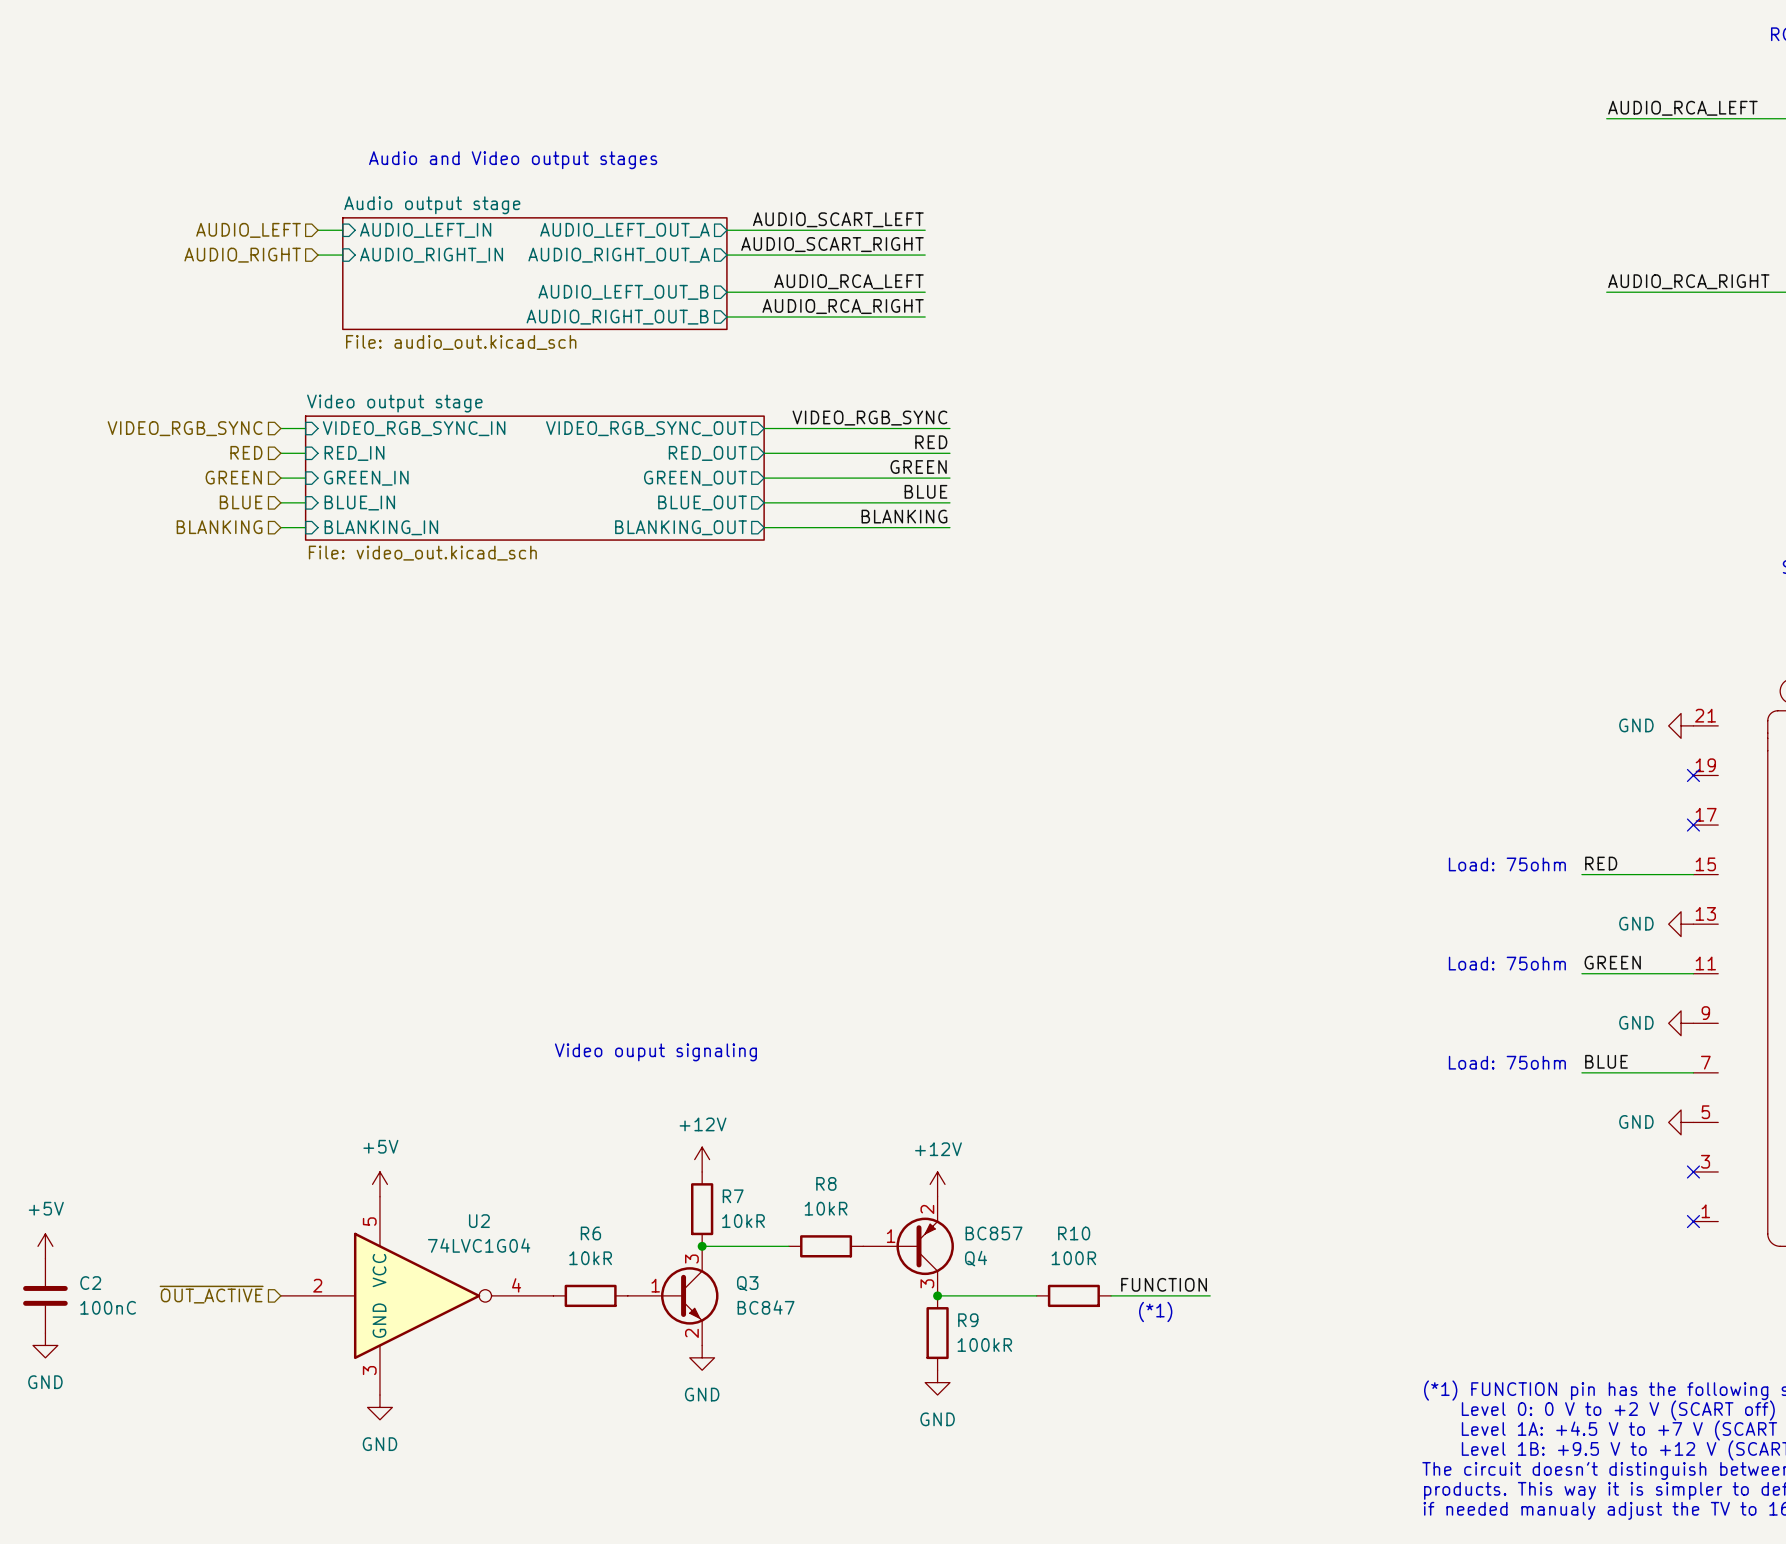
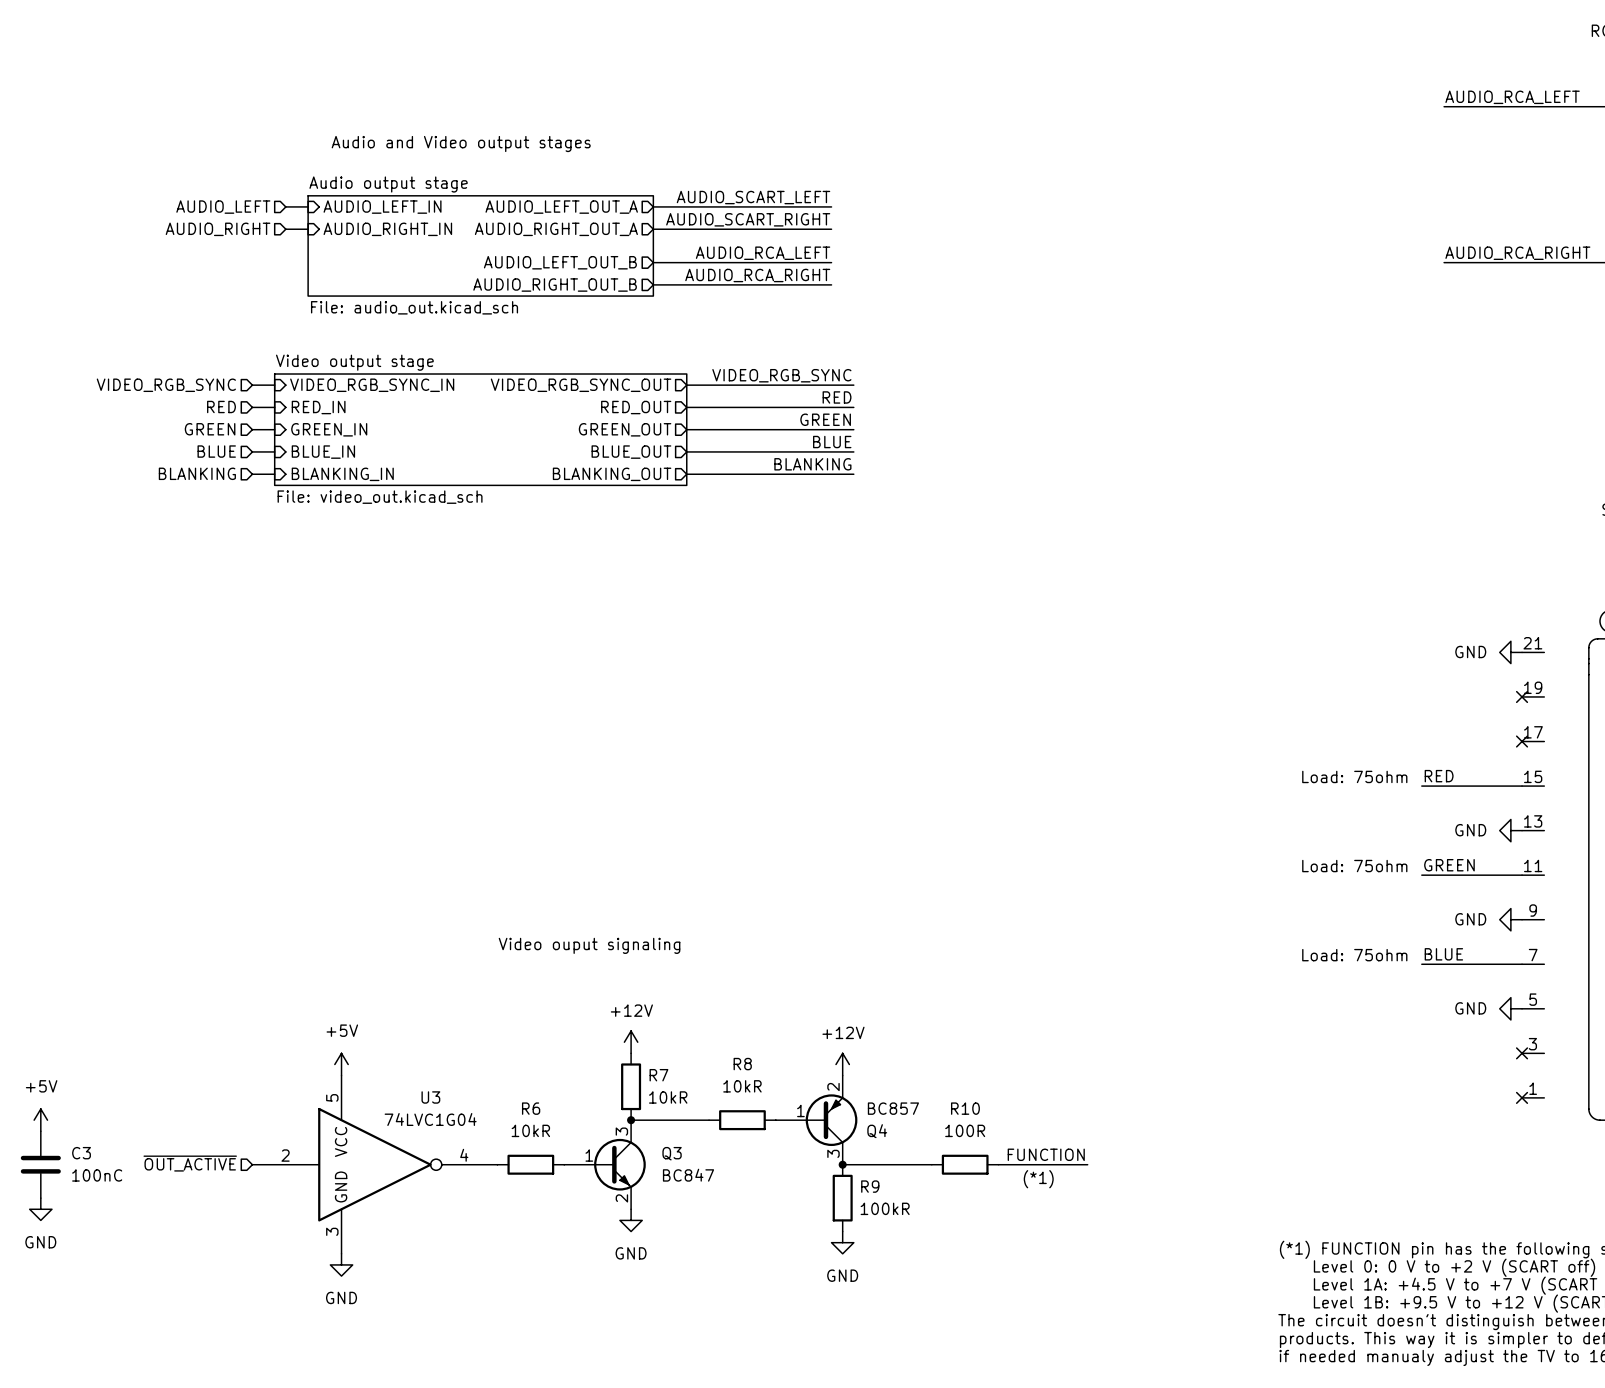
U2 name: U2 (479, 1221) -> U3 (430, 1097)
C2 name: C2 (90, 1283) -> C3 (81, 1153)

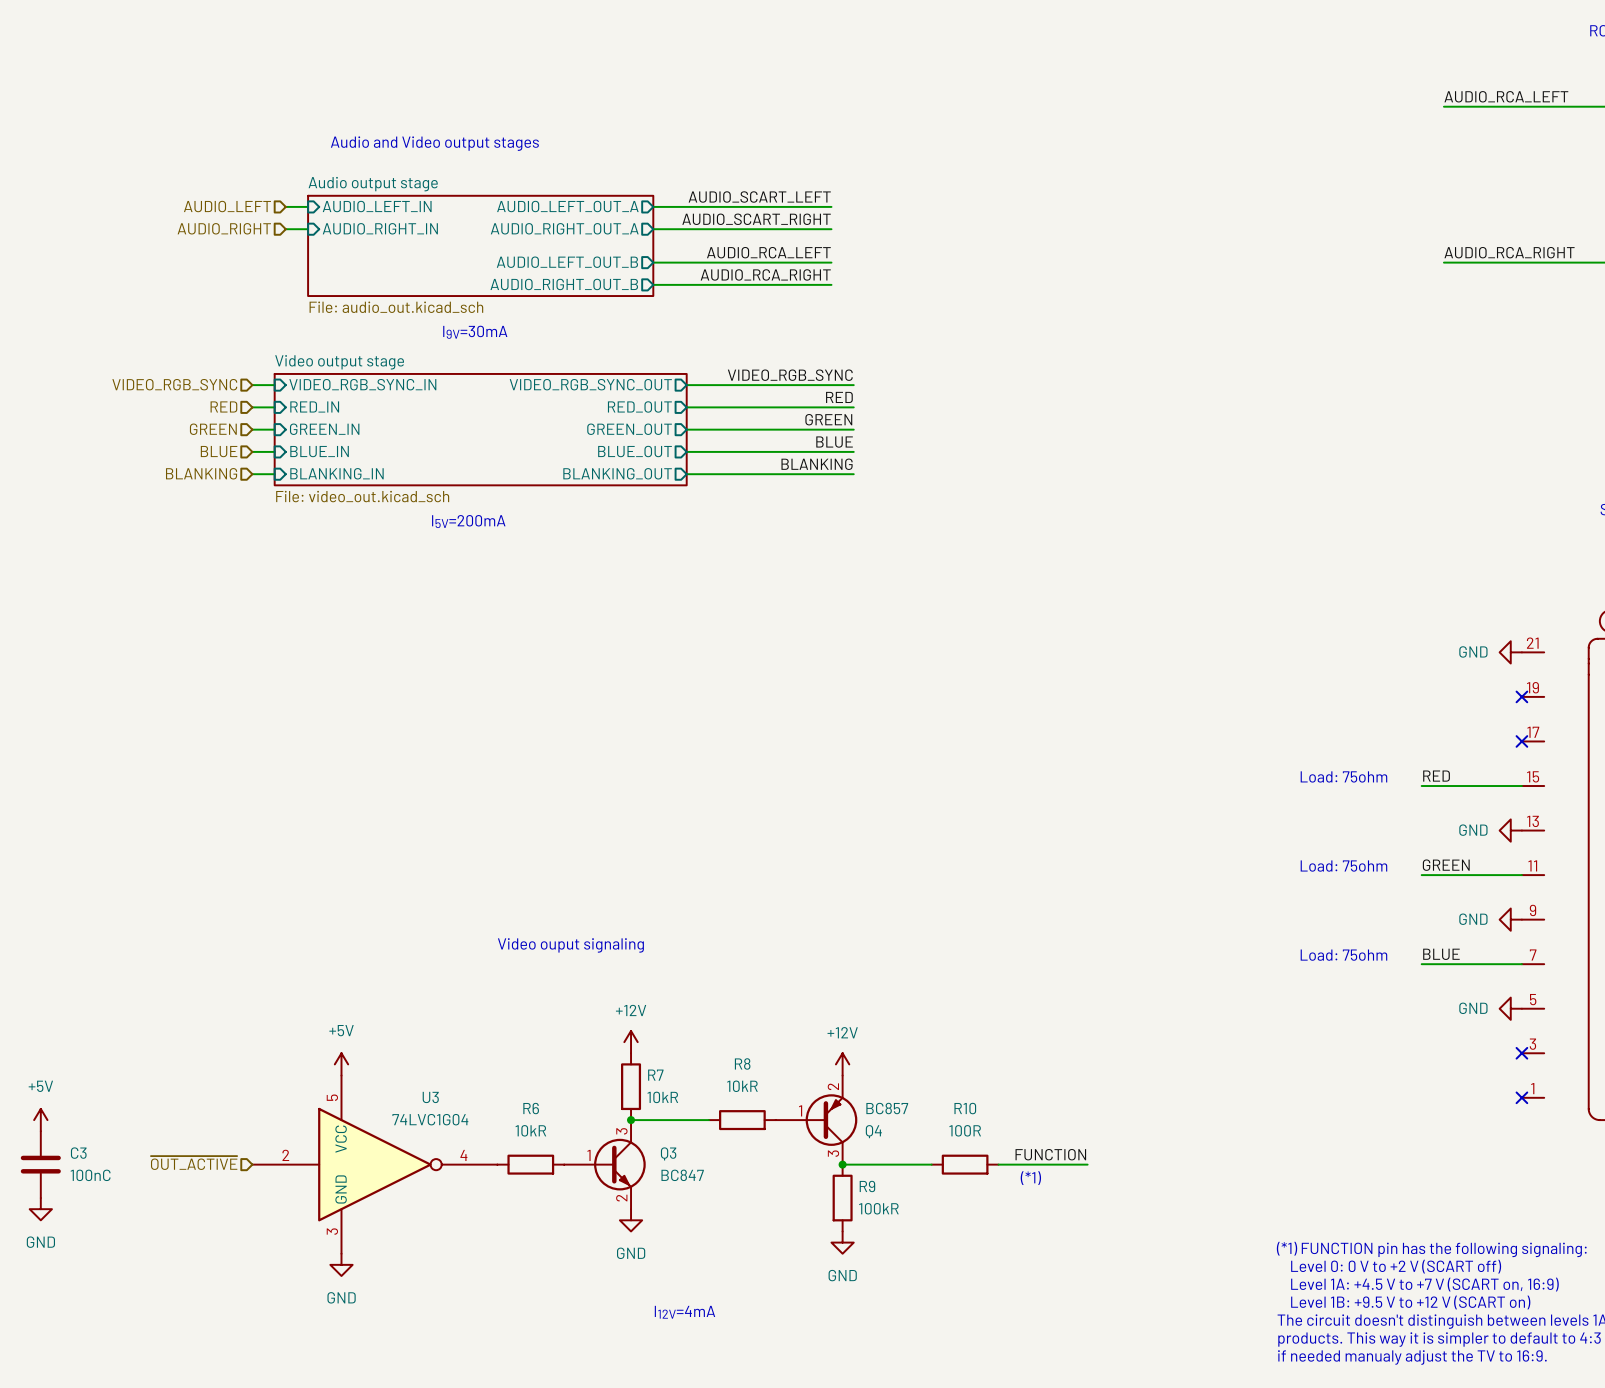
text: none -> I9V=30mA (475, 332)
text: none -> I5V=200mA (468, 521)
text: none -> I12V=4mA (684, 1312)

